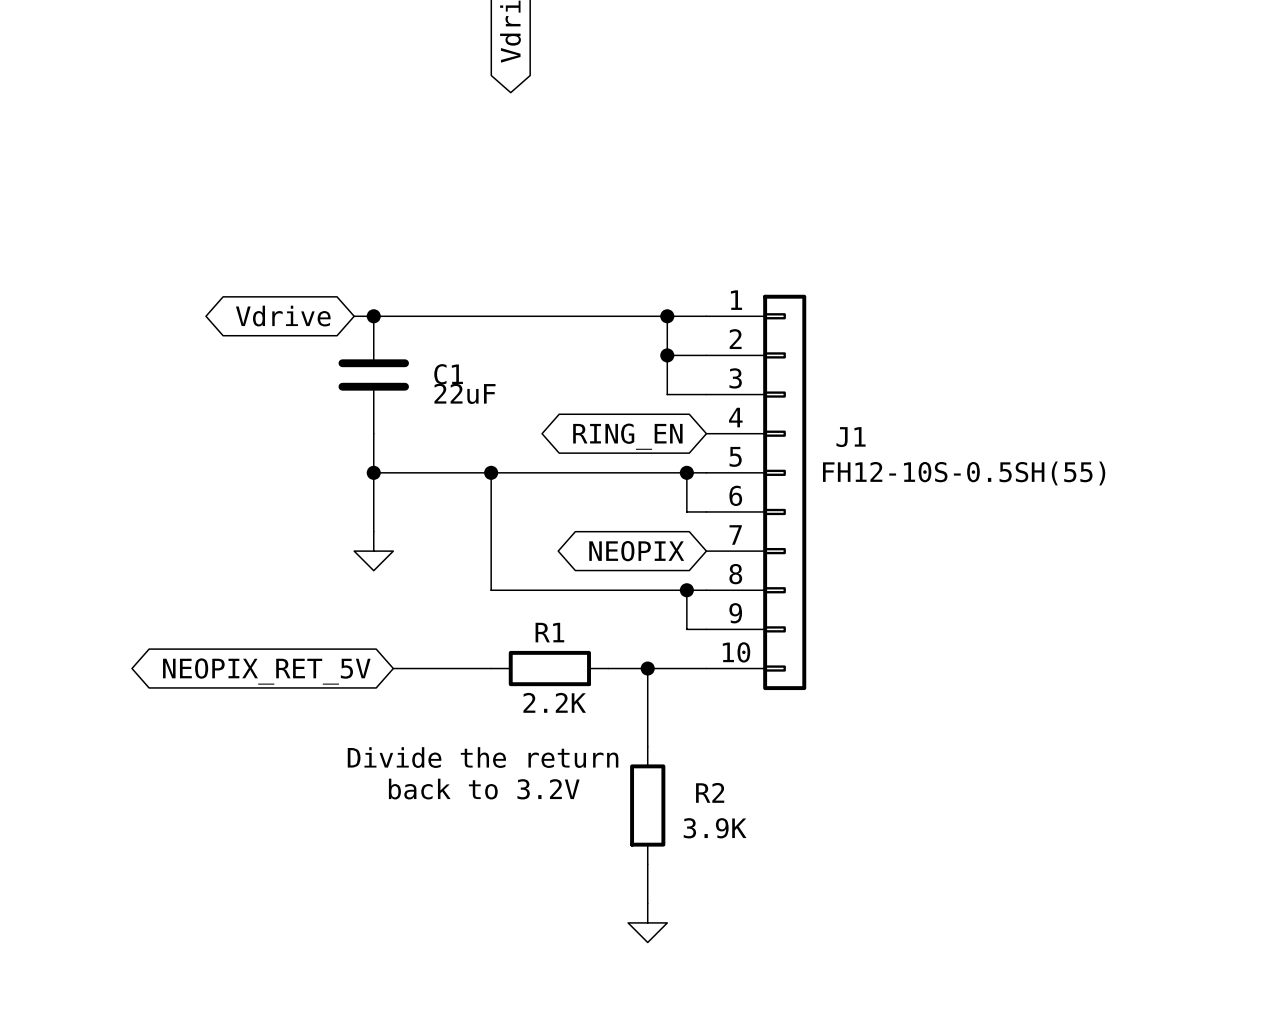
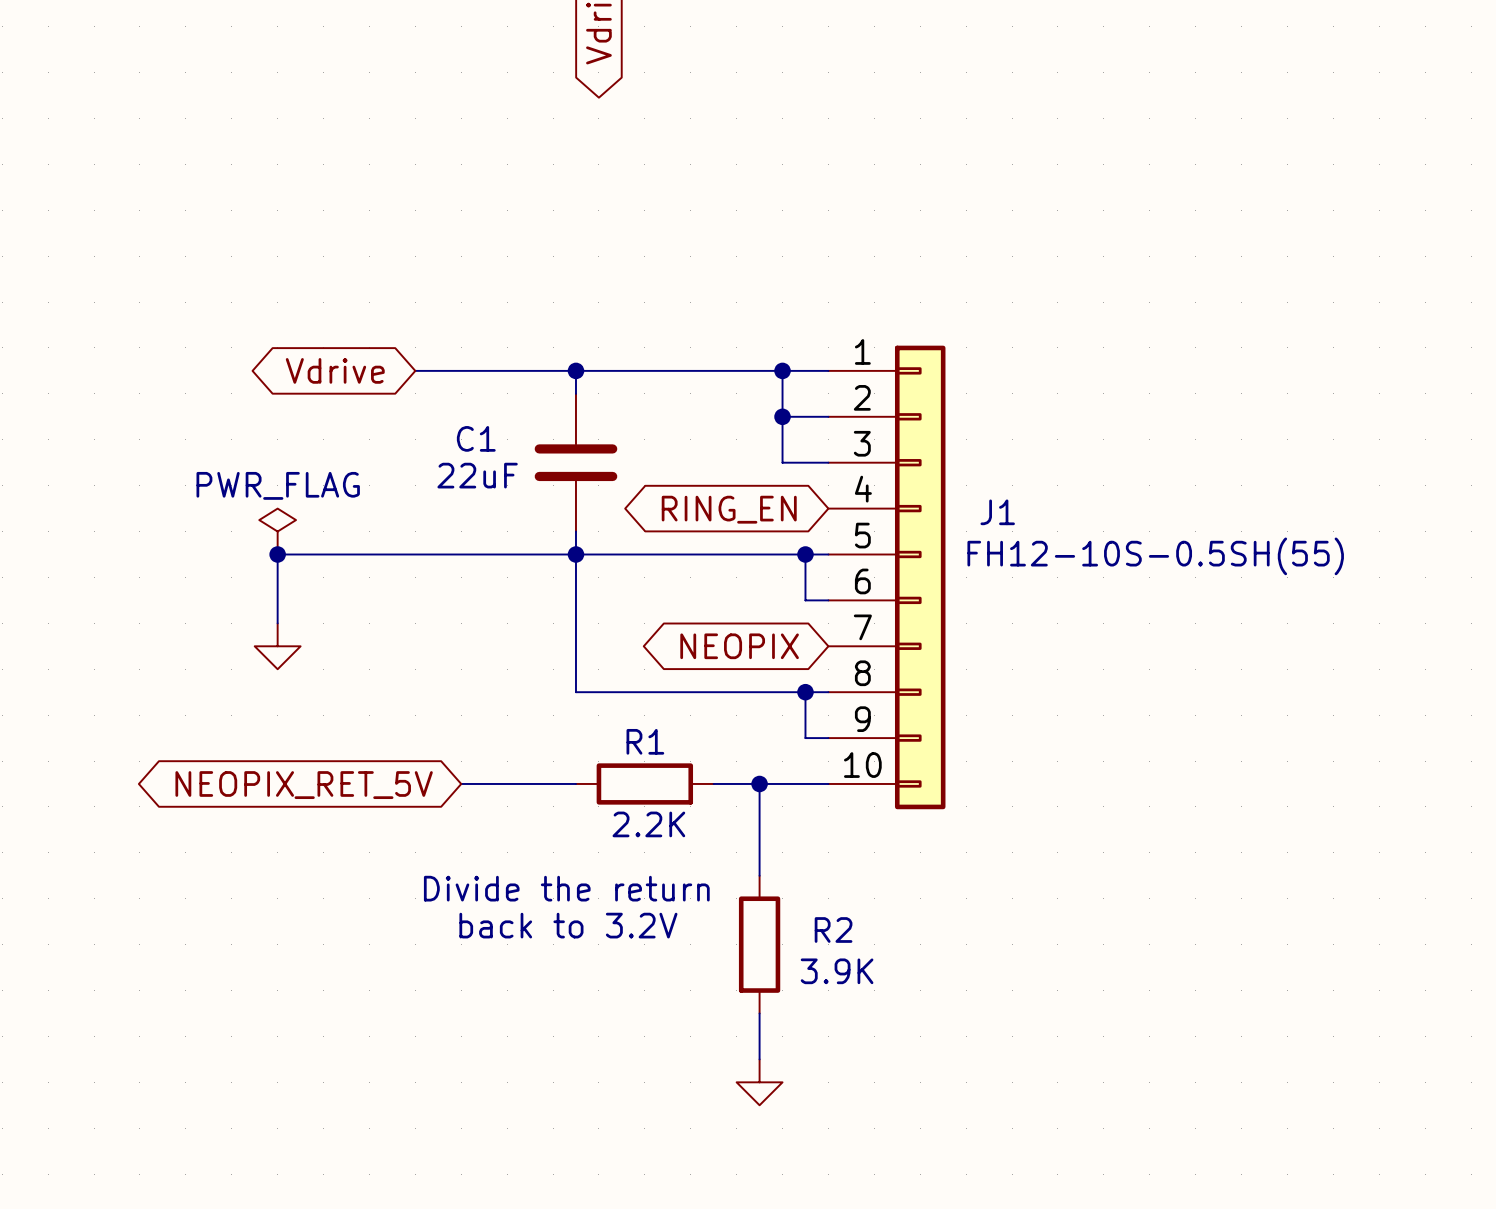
junction: (373, 316) -> none
wire: none -> (575, 370) (575, 393)
junction: none -> (575, 370)
C1 position: (373, 374) -> (575, 462)
C1 name position: C1 (448, 374) -> C1 (476, 438)
C1 value position: 22uF (464, 393) -> 22uF (477, 475)
wire: (373, 433) (373, 531) -> none
power symbol: none -> PWR_FLAG (277, 531)
wire: none -> (575, 531) (575, 554)
junction: none -> (277, 554)
wire: none -> (438, 554) (277, 554) (277, 623)
junction: (373, 472) -> none
power symbol position: (373, 551) -> (277, 646)

